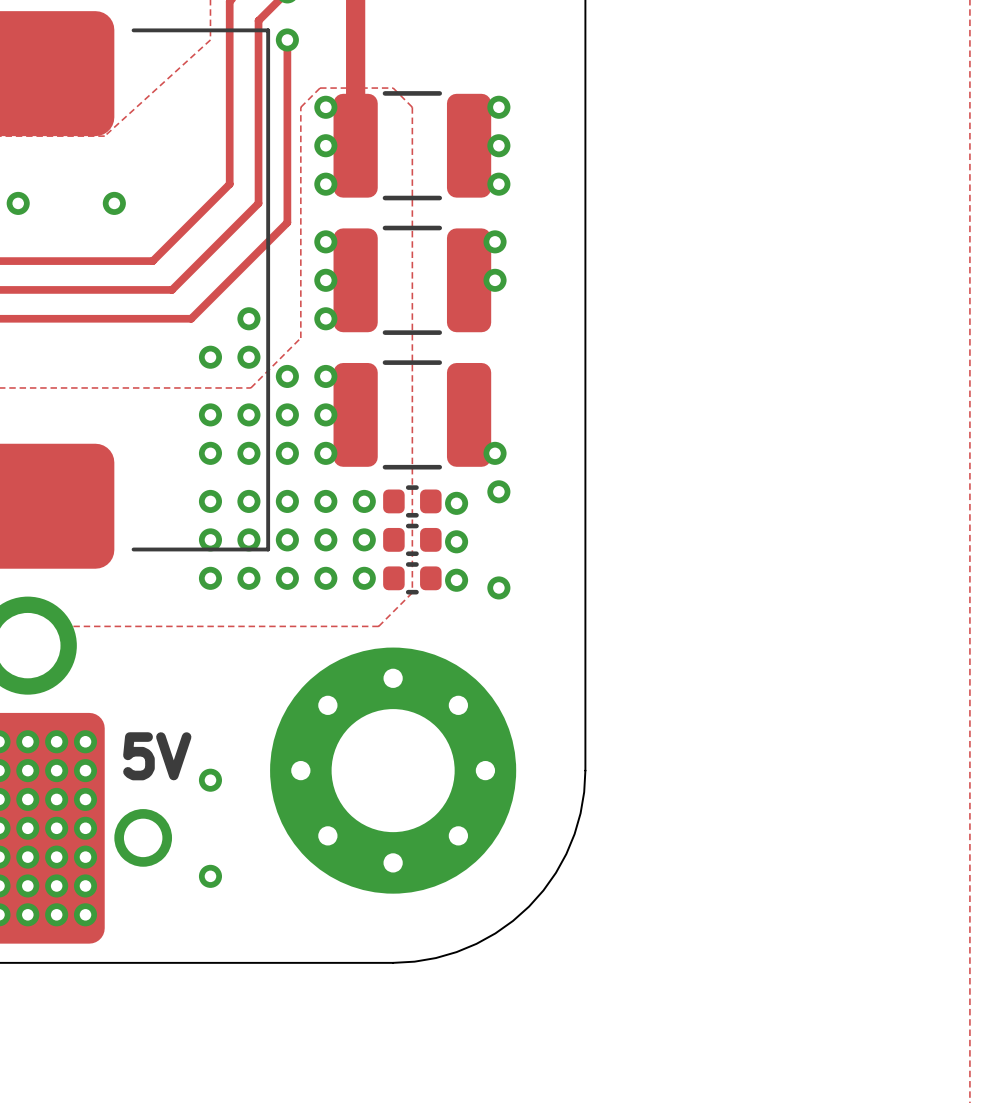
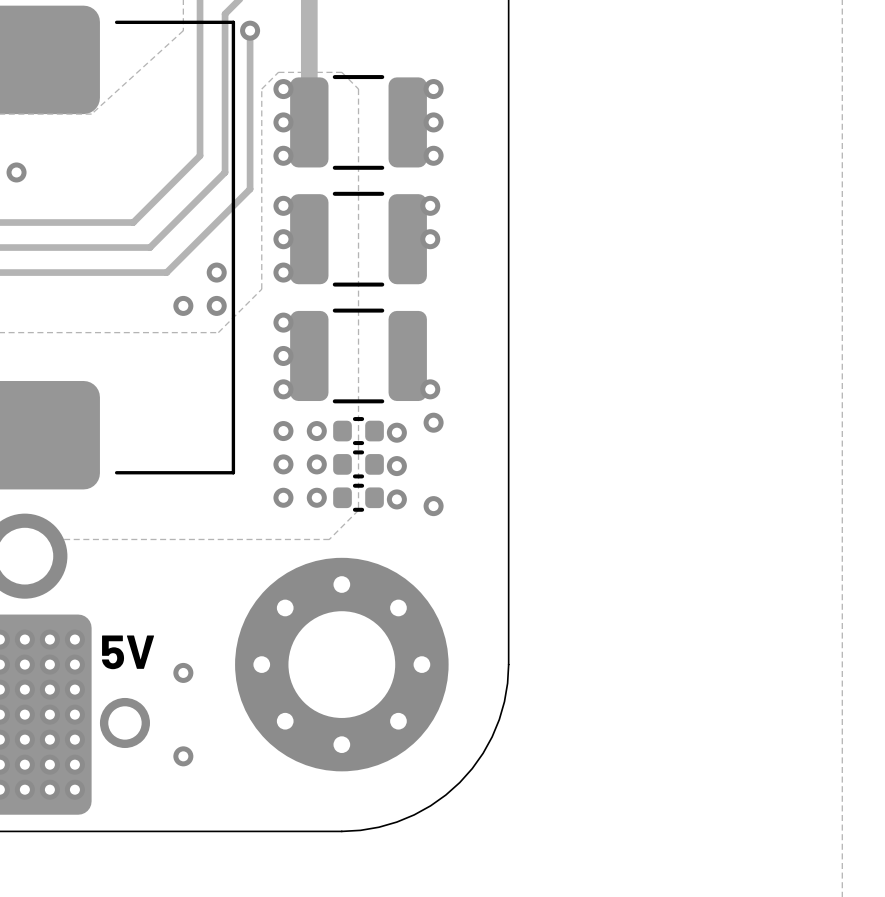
via: (114, 203) -> none
via: (287, 376) -> none
via: (210, 414) -> none
via: (248, 414) -> none
via: (287, 414) -> none
via: (210, 453) -> none
via: (248, 453) -> none
via: (287, 453) -> none
via: (210, 501) -> none
via: (248, 501) -> none
via: (287, 501) -> none
via: (210, 539) -> none
via: (248, 539) -> none
via: (287, 539) -> none
via: (210, 578) -> none
via: (248, 578) -> none
via: (287, 578) -> none

